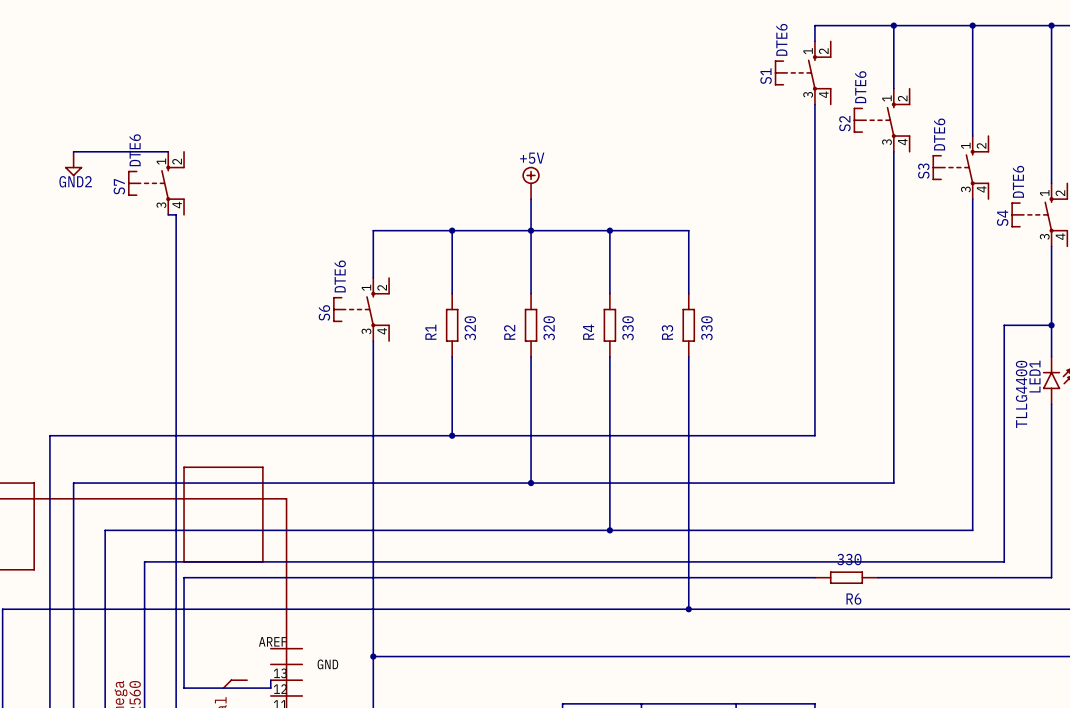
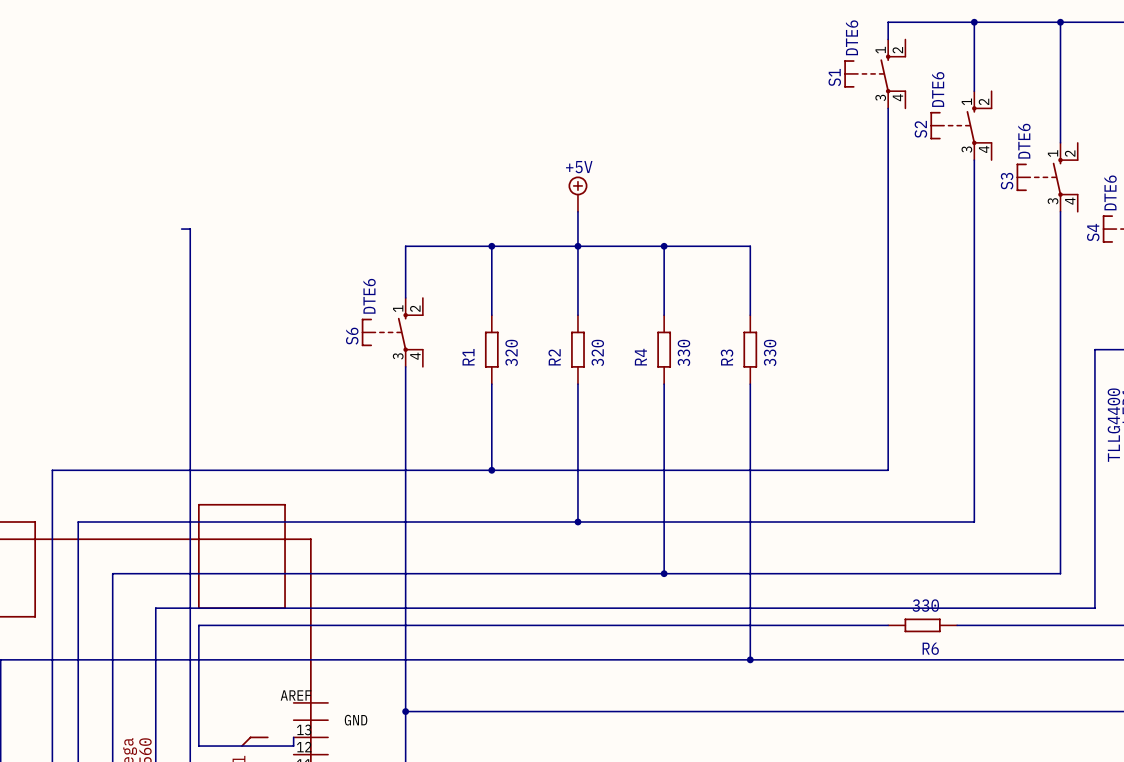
wire: (73, 151) (168, 151) -> none
power symbol: GND2 (73, 164) -> none
S7: DTE6 (156, 183) -> none

